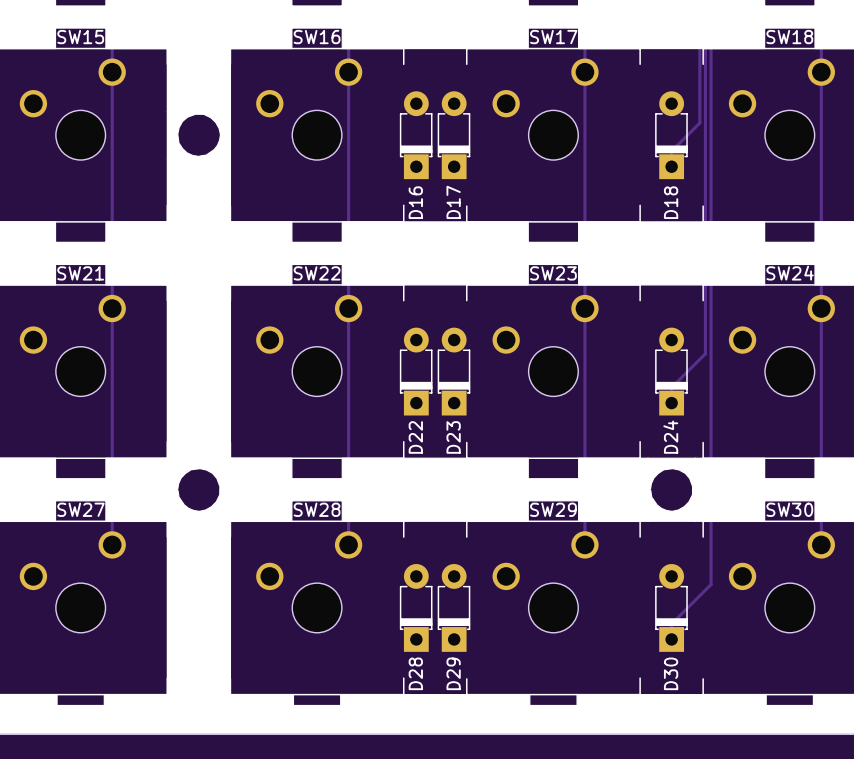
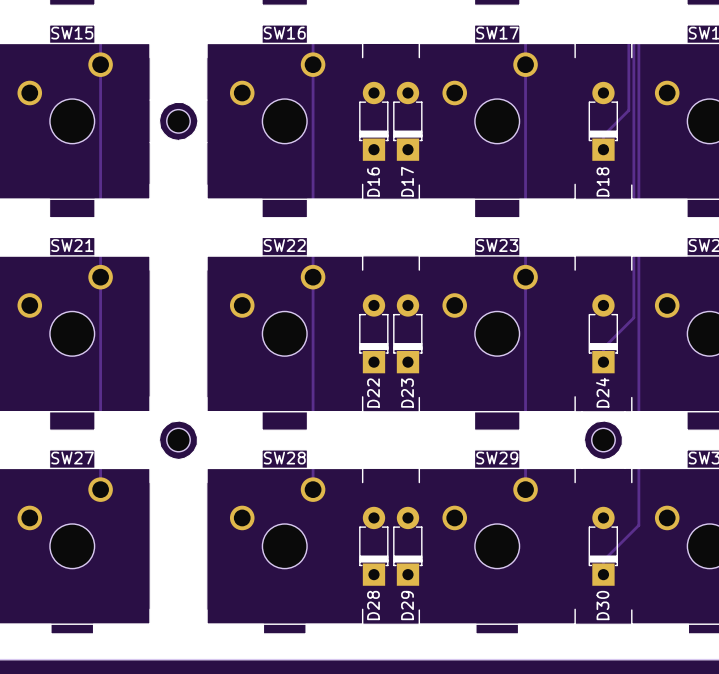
part: none -> (178, 121)
part: none -> (178, 440)
part: none -> (603, 440)

